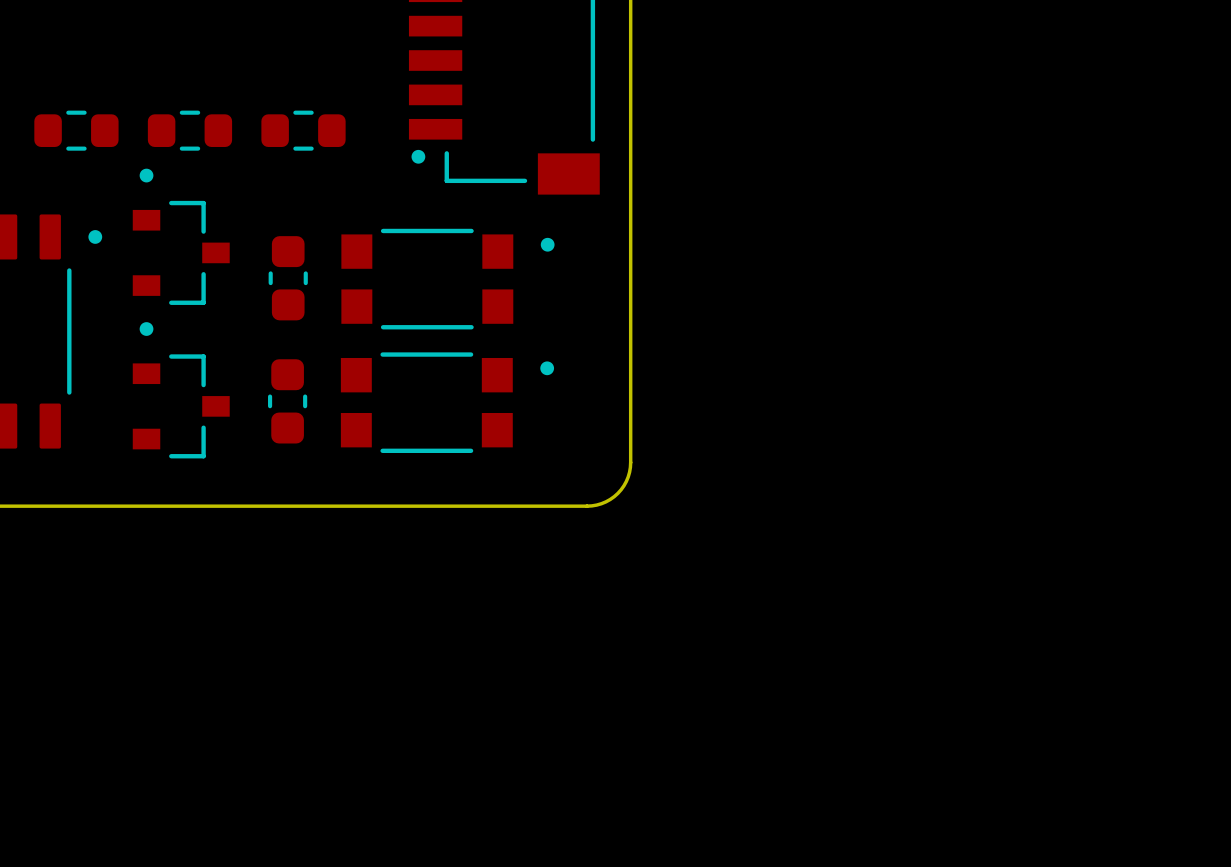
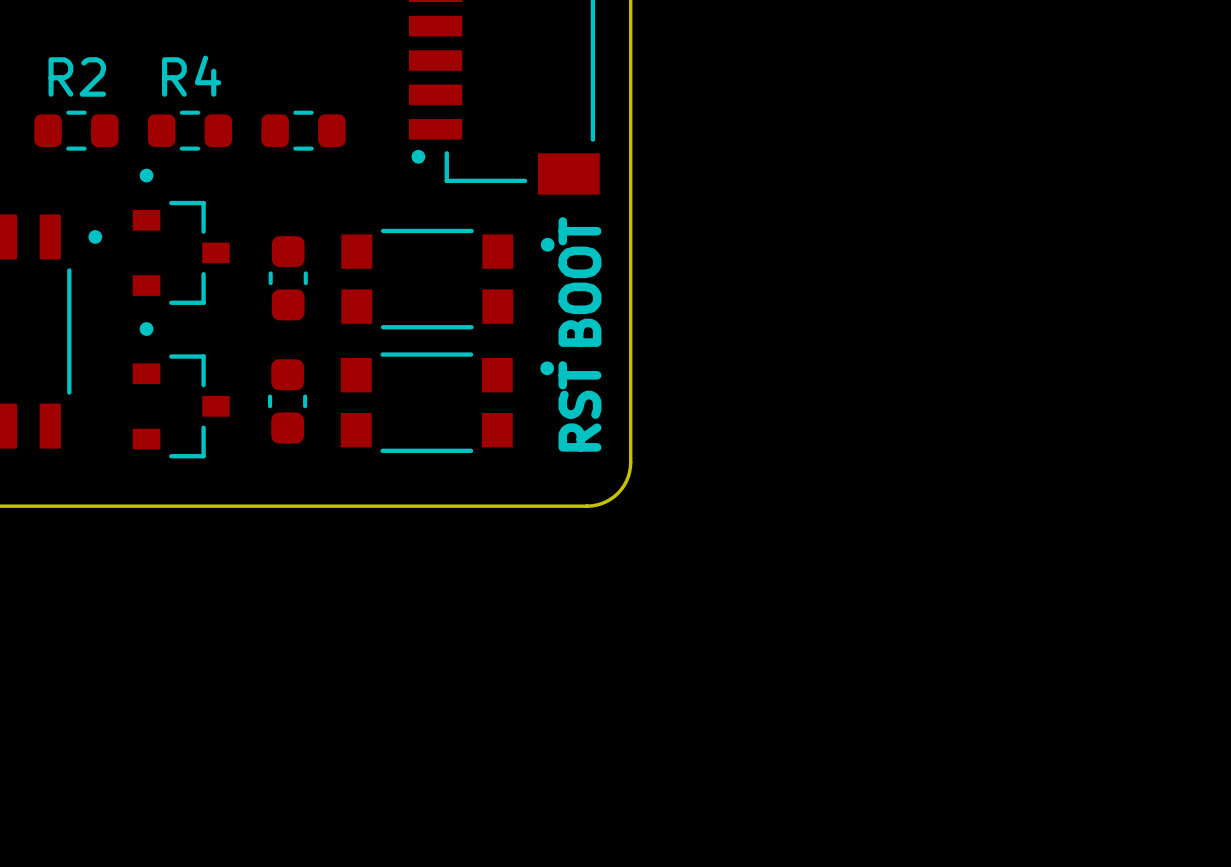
R2 name: none -> R2 (77, 76)
R4 name: none -> R4 (191, 76)
text: none -> BOOT (579, 281)
text: none -> RST (579, 406)

